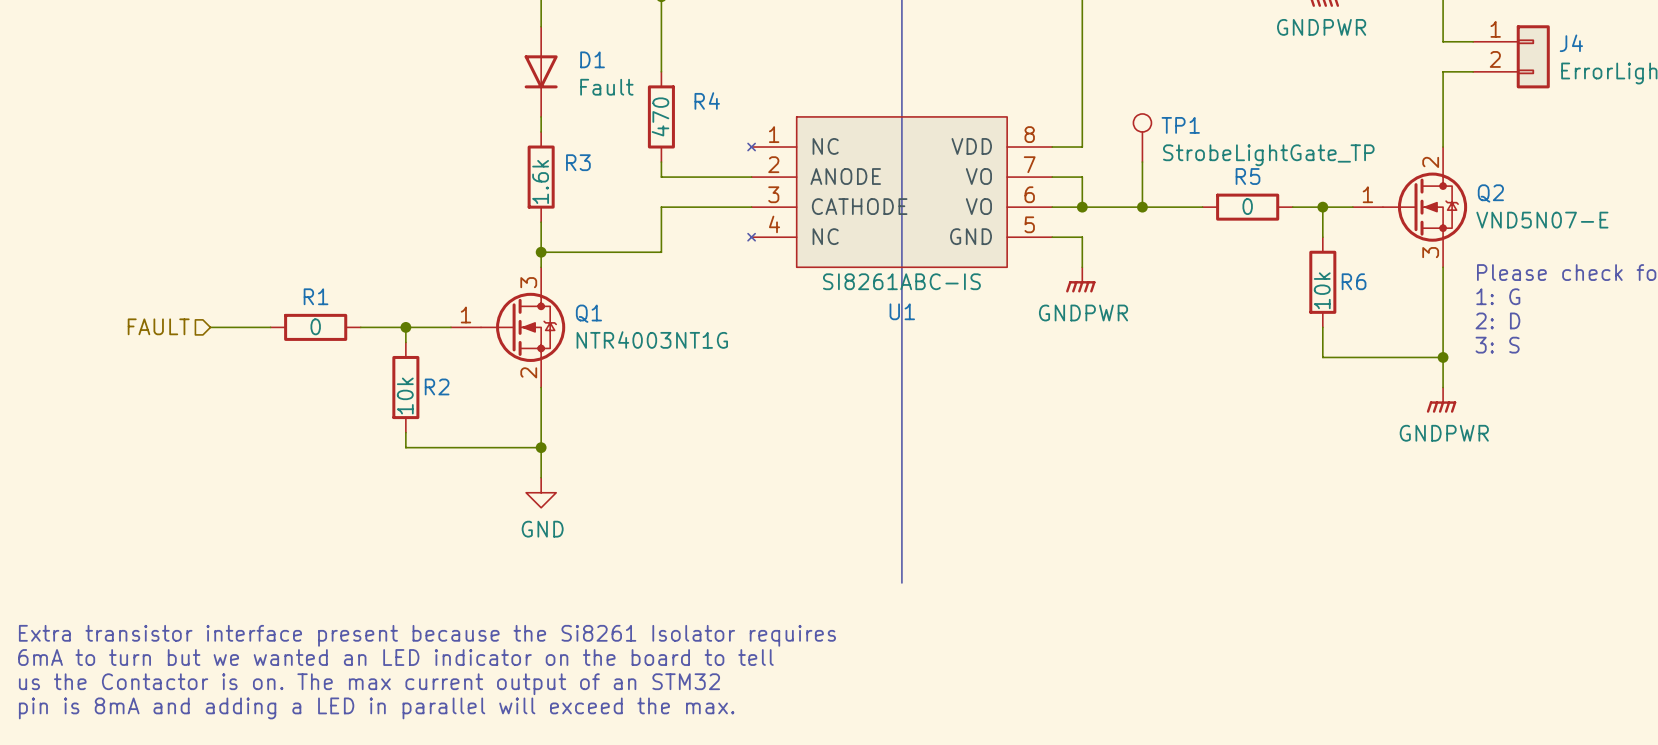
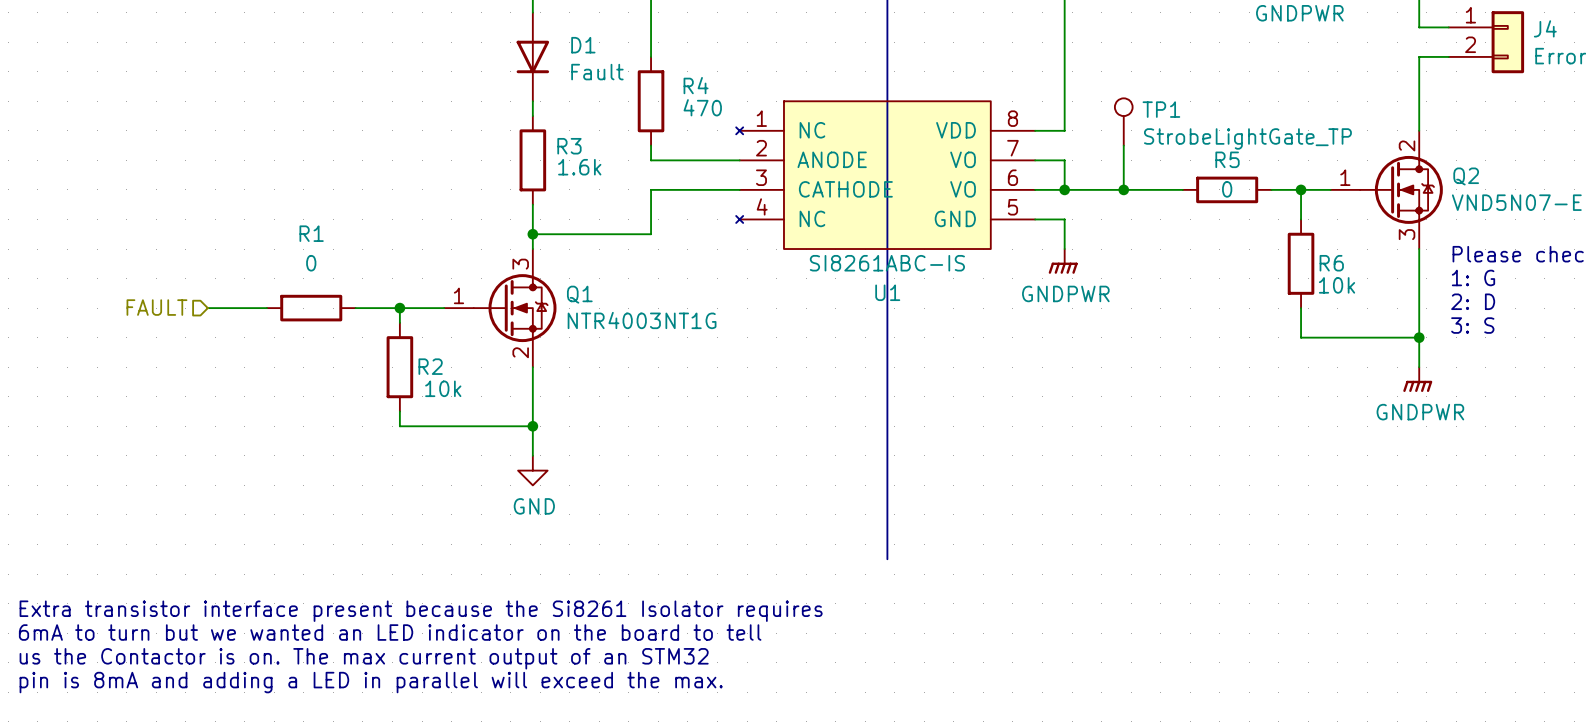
R4 value rotation: 0° (660, 116) -> 90° clockwise (702, 107)
R4 value position: 470 (660, 116) -> 470 (702, 107)
R3 value rotation: 0° (540, 181) -> 90° clockwise (579, 167)
R6 value rotation: 0° (1322, 290) -> 90° clockwise (1337, 285)
R1 name position: R1 (316, 296) -> R1 (311, 233)
R1 value position: 0 (315, 326) -> 0 (311, 263)
R2 value rotation: 0° (405, 396) -> 90° clockwise (443, 388)
R2 value position: 10k (405, 396) -> 10k (443, 388)

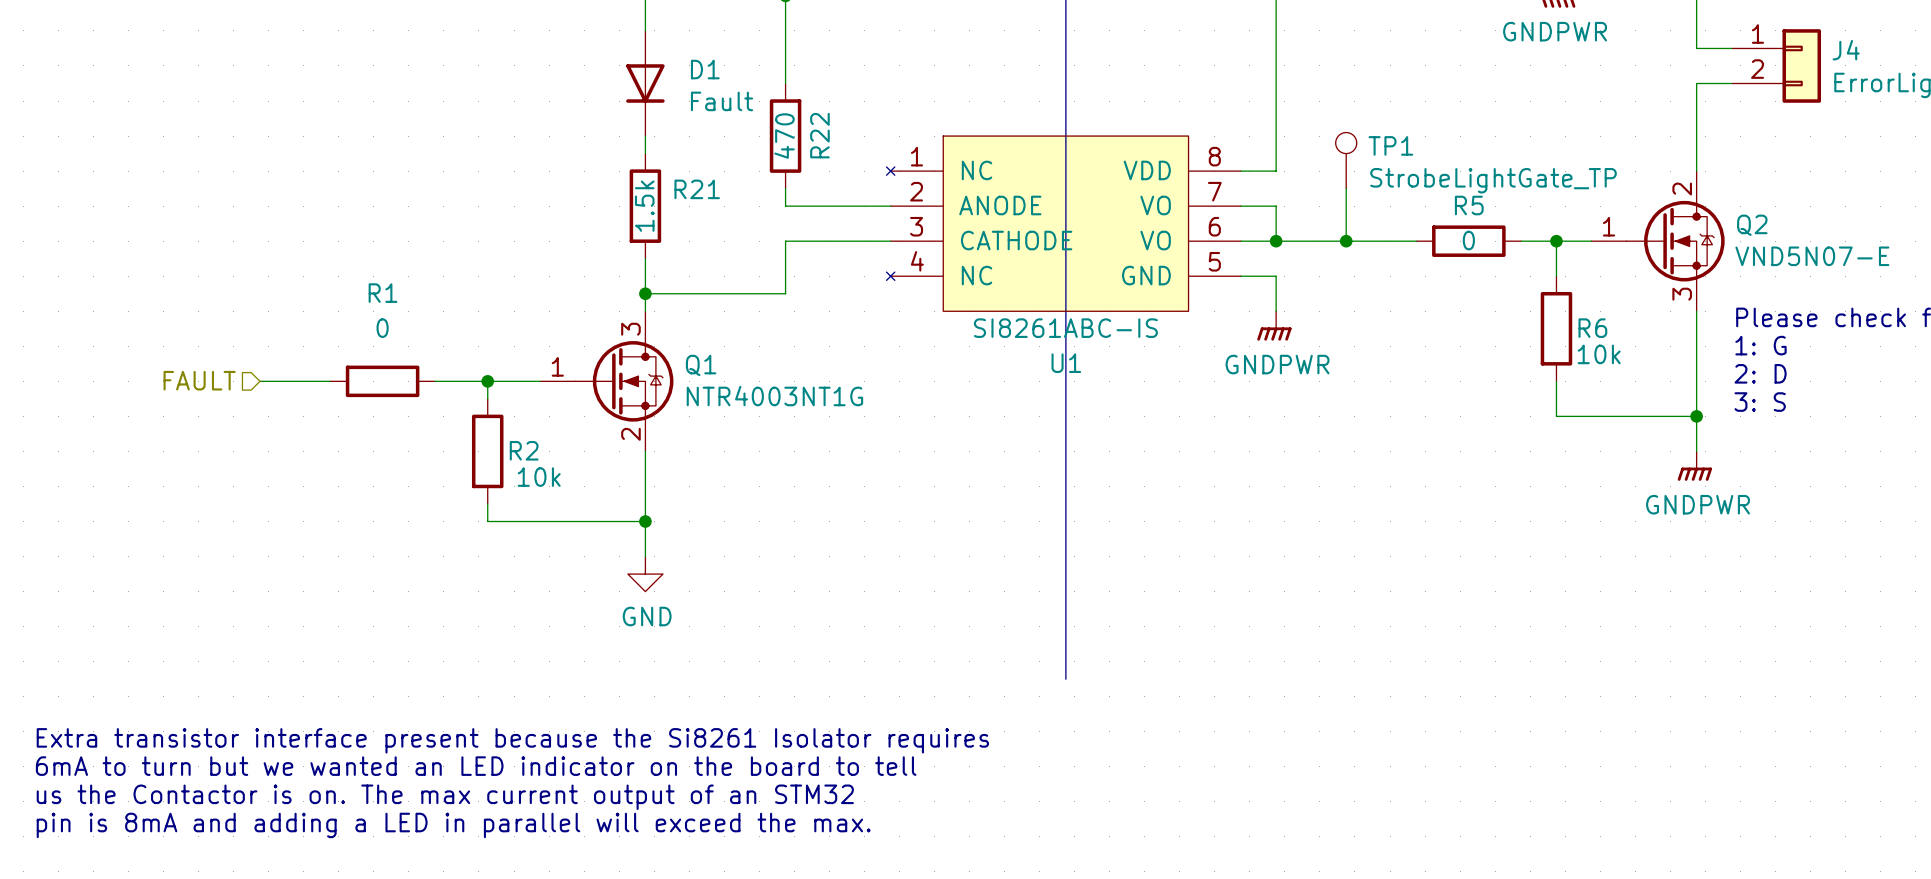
R4 name: R4 (696, 85) -> R22 (819, 135)
R4 value rotation: 0° (702, 107) -> 90° counterclockwise (784, 136)
R4 value position: 470 (702, 107) -> 470 (784, 136)
R3 name: R3 (569, 146) -> R21 (697, 189)
R3 value: 1.6k (579, 167) -> 1.5k (644, 206)

